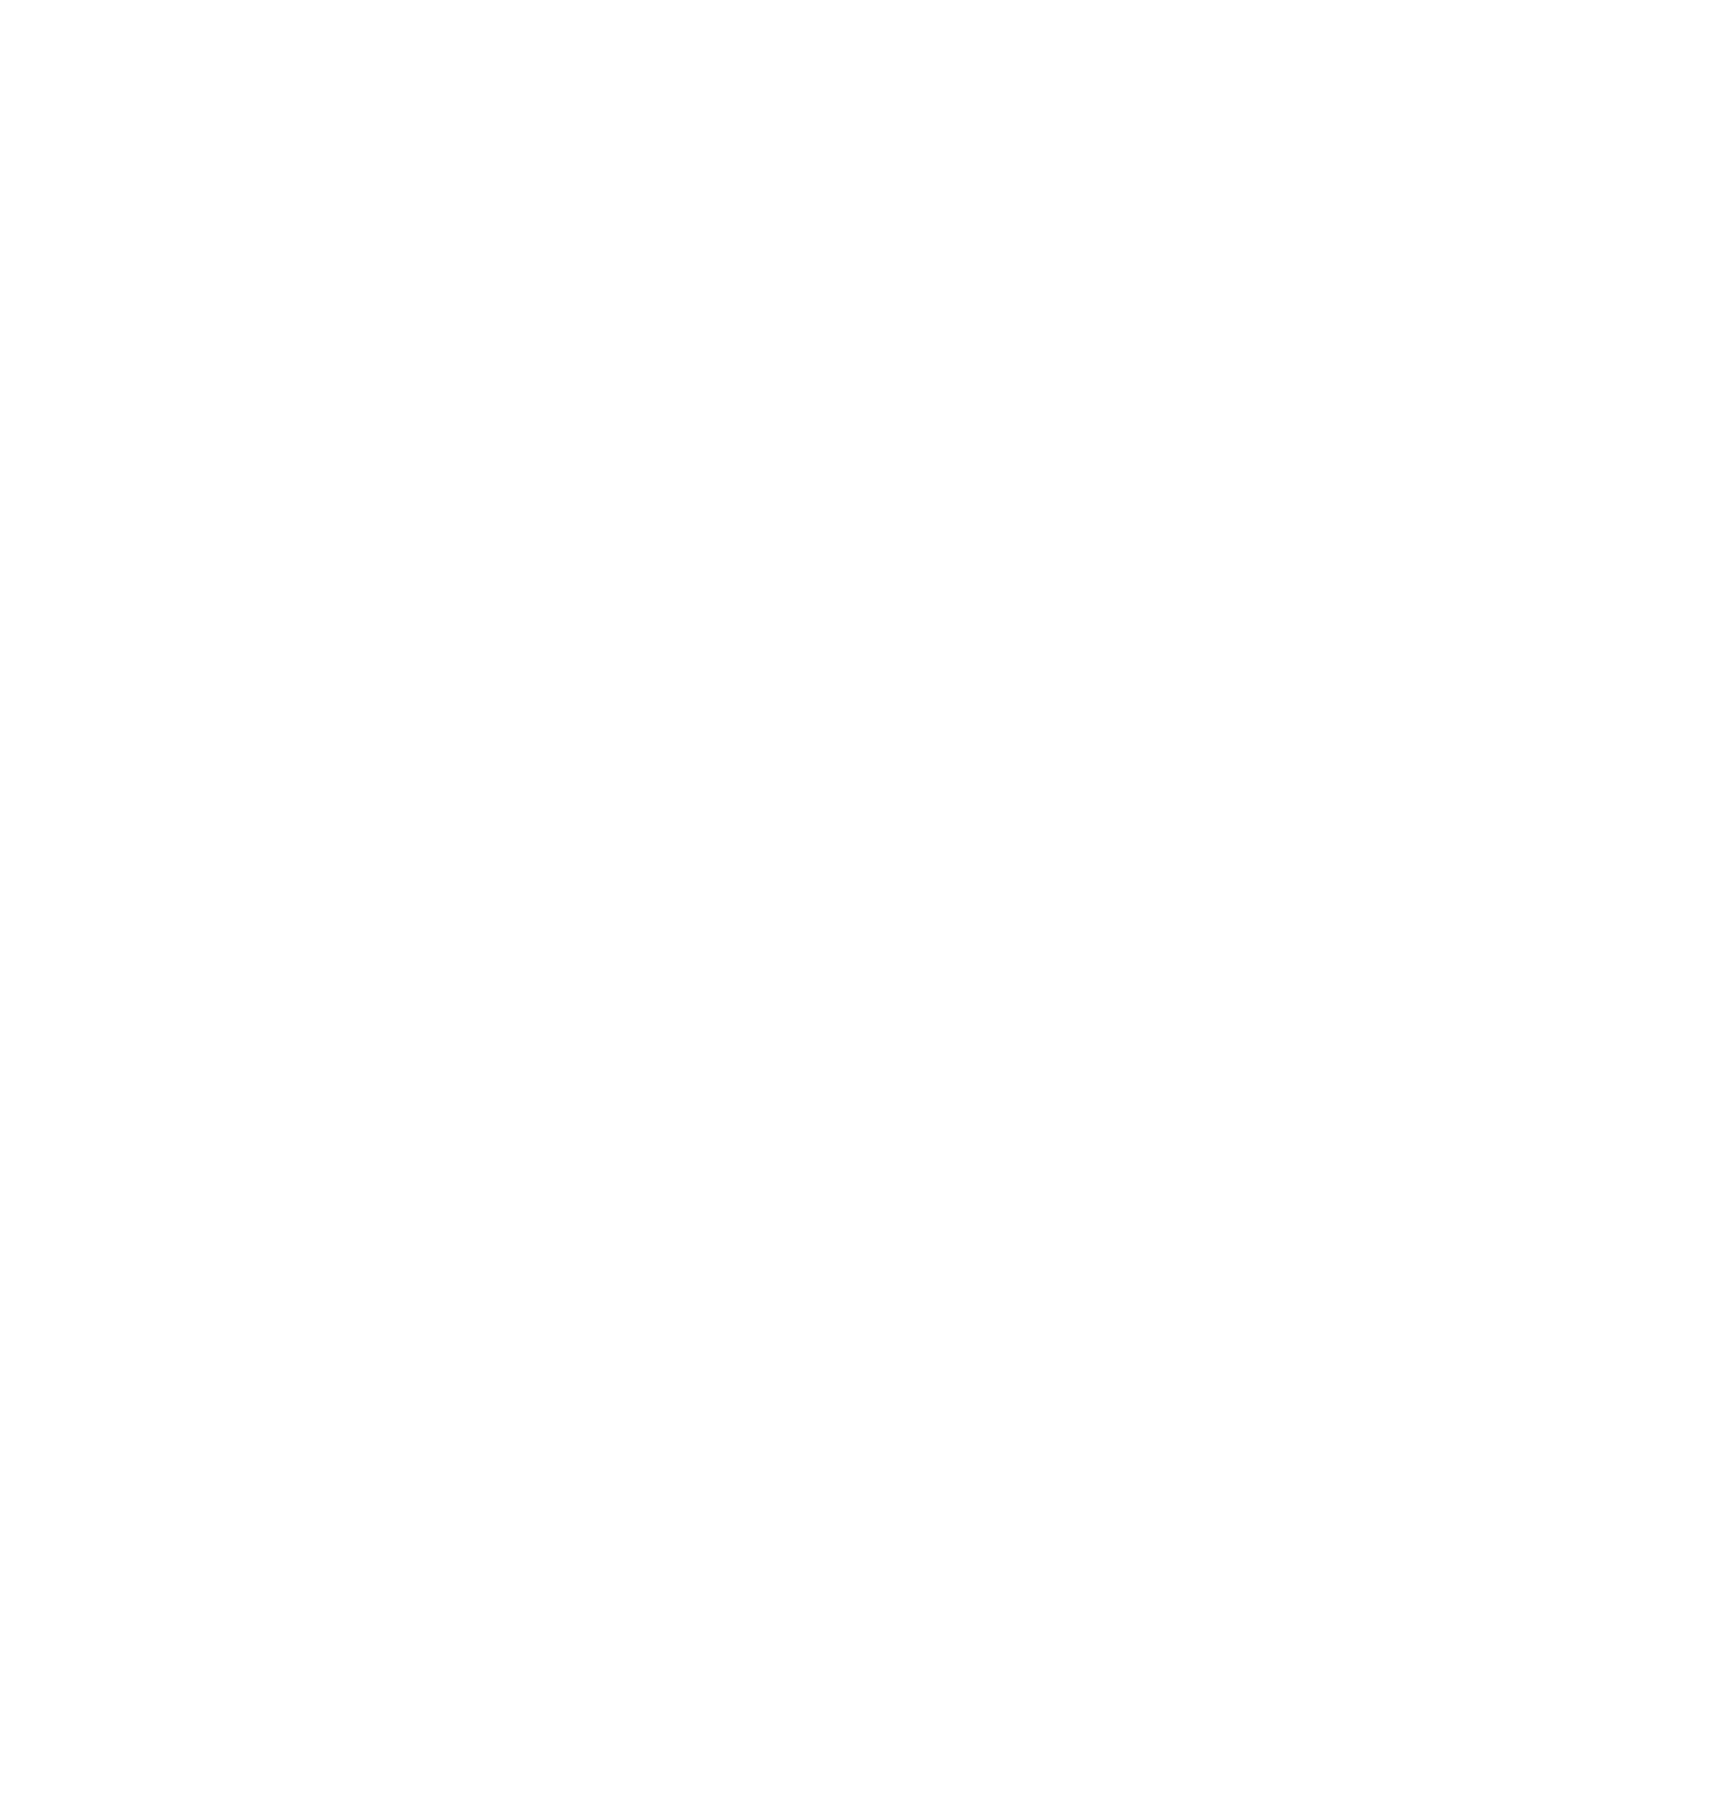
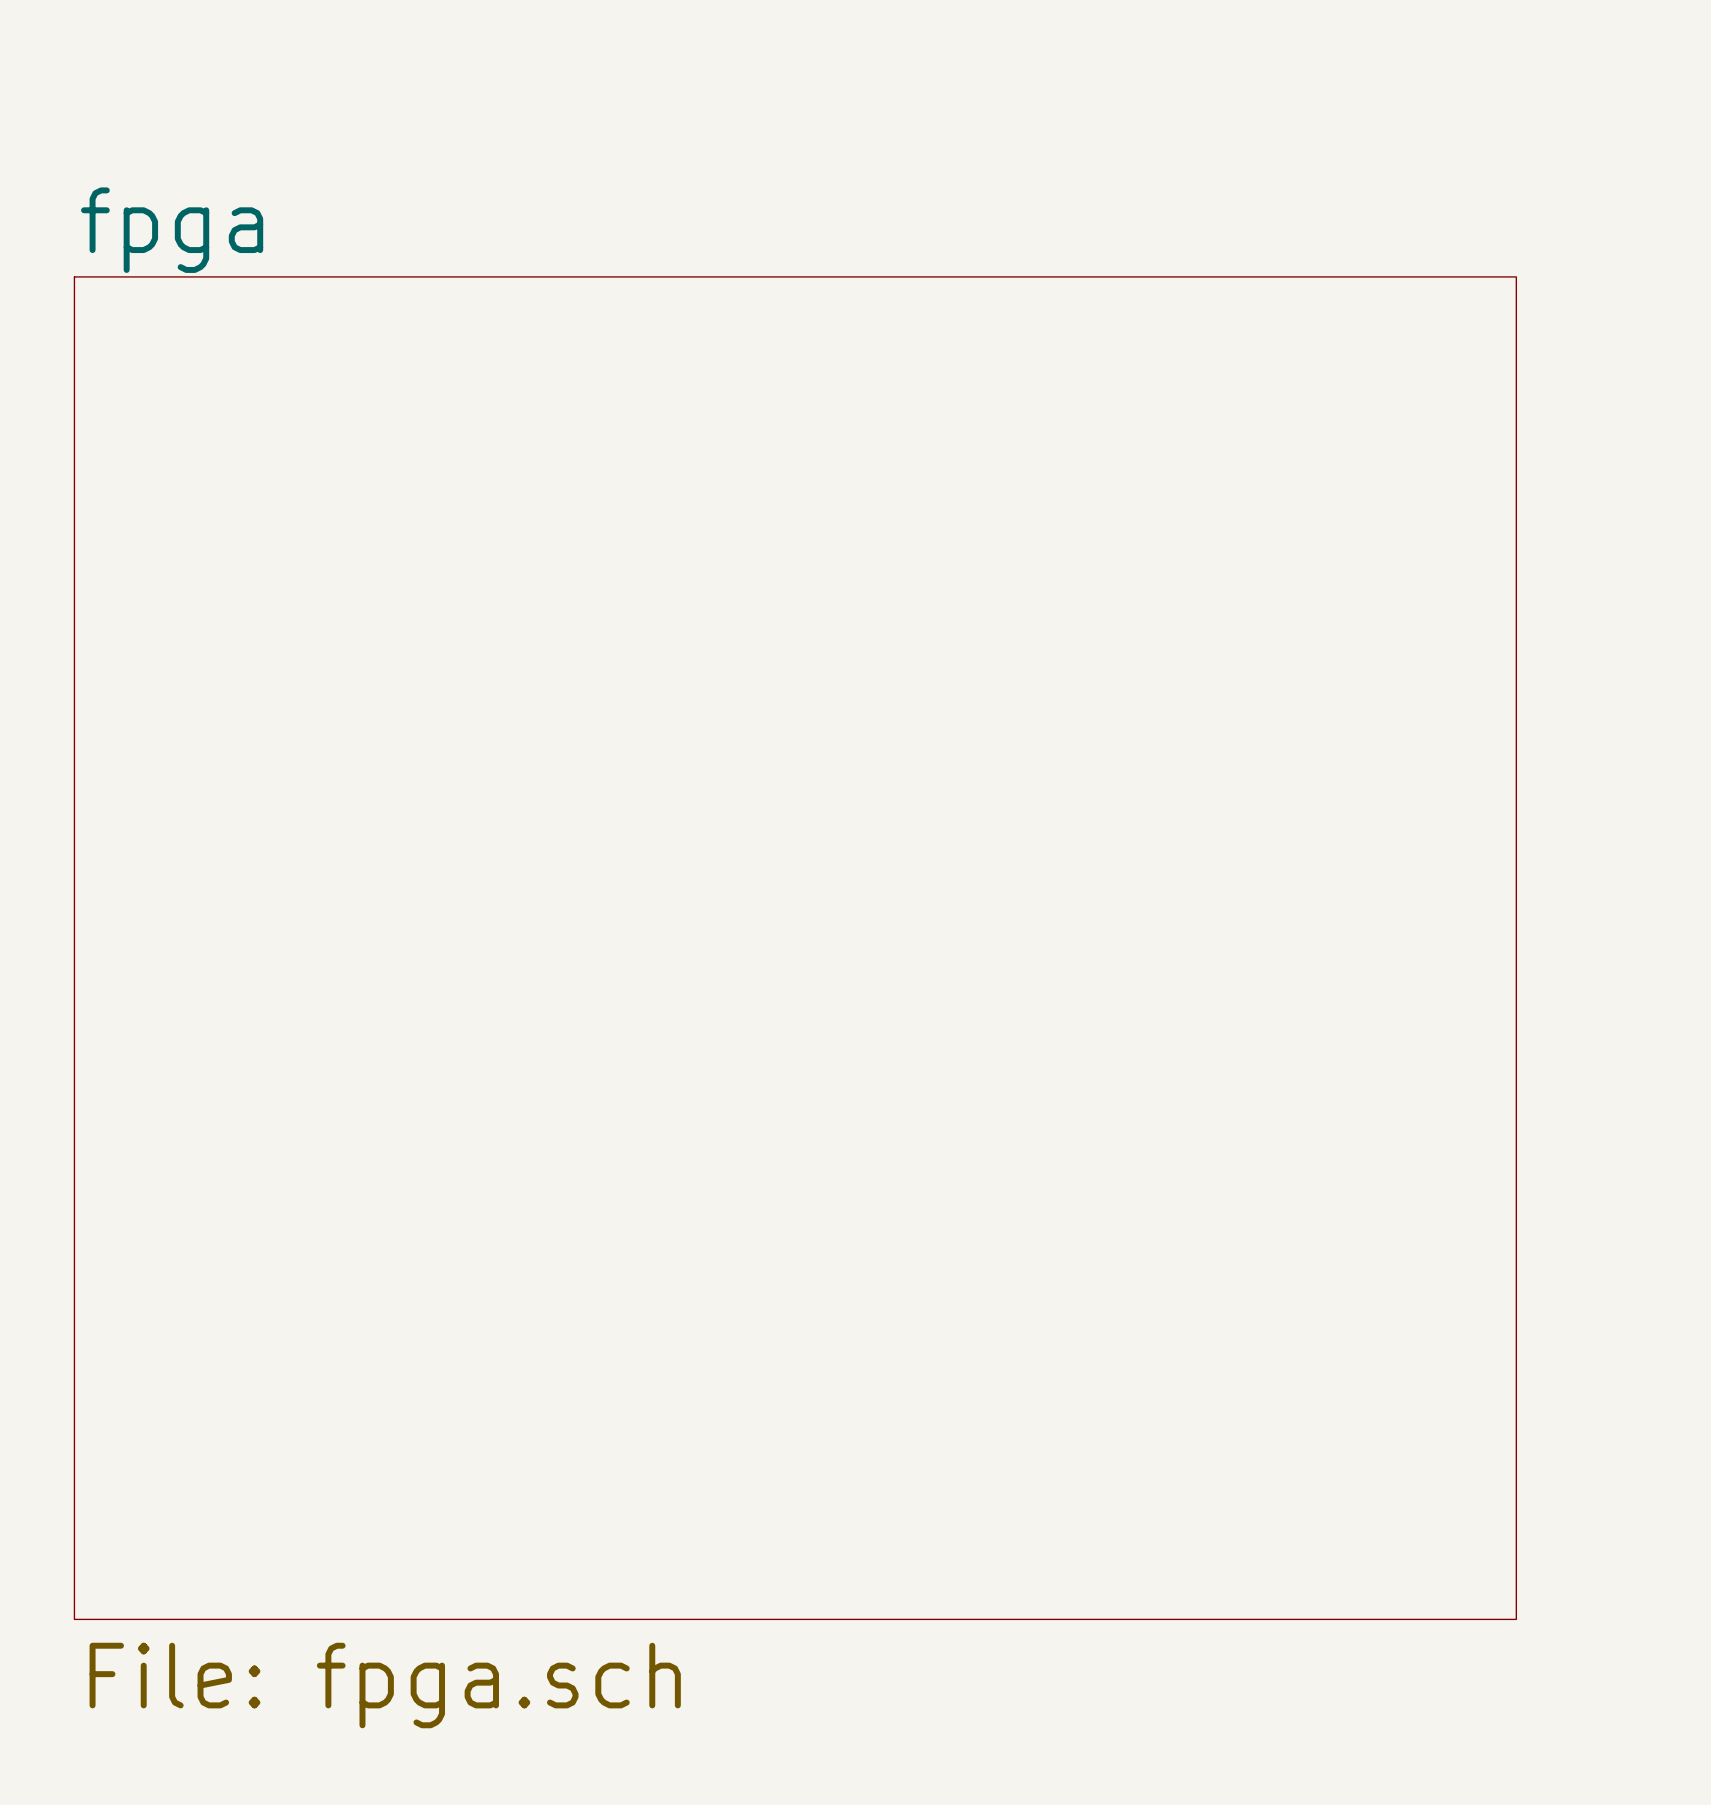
sheet fpga: none -> File: fpga.sch (795, 948)

